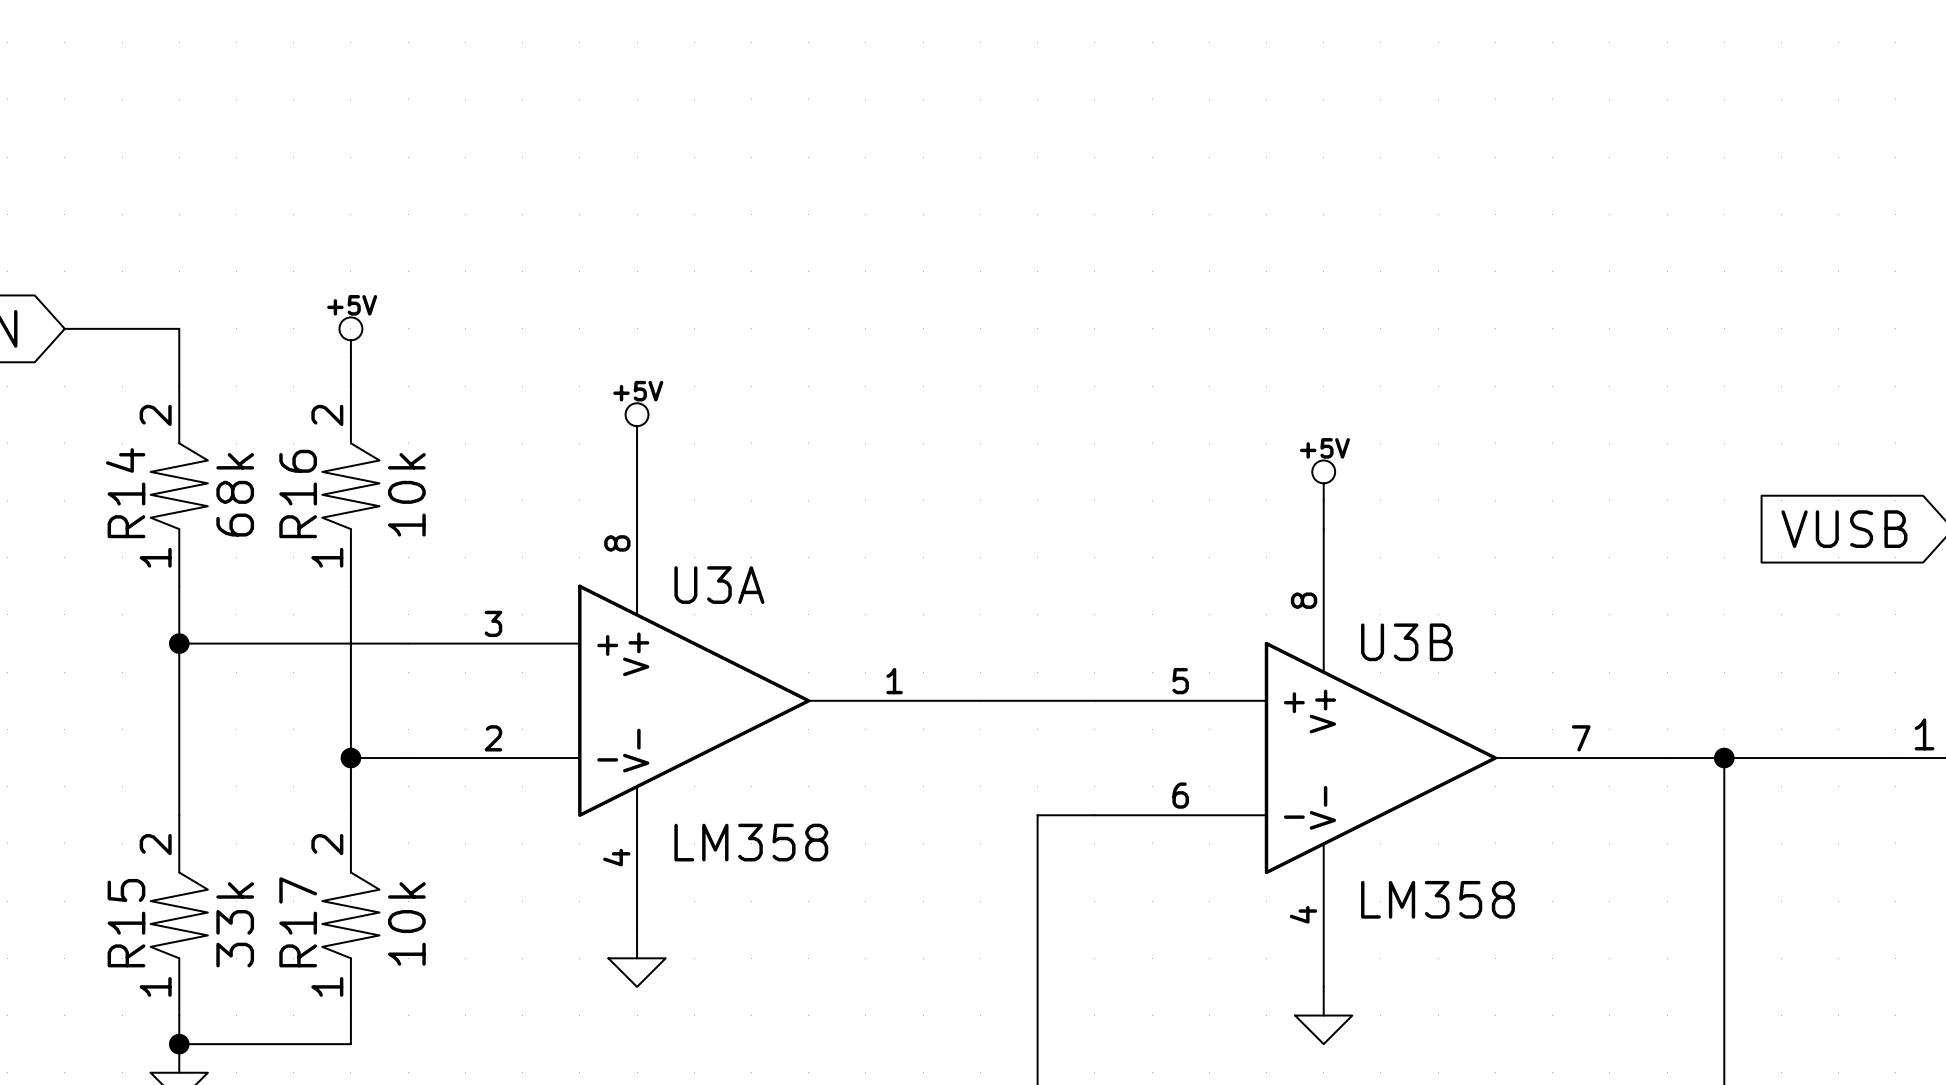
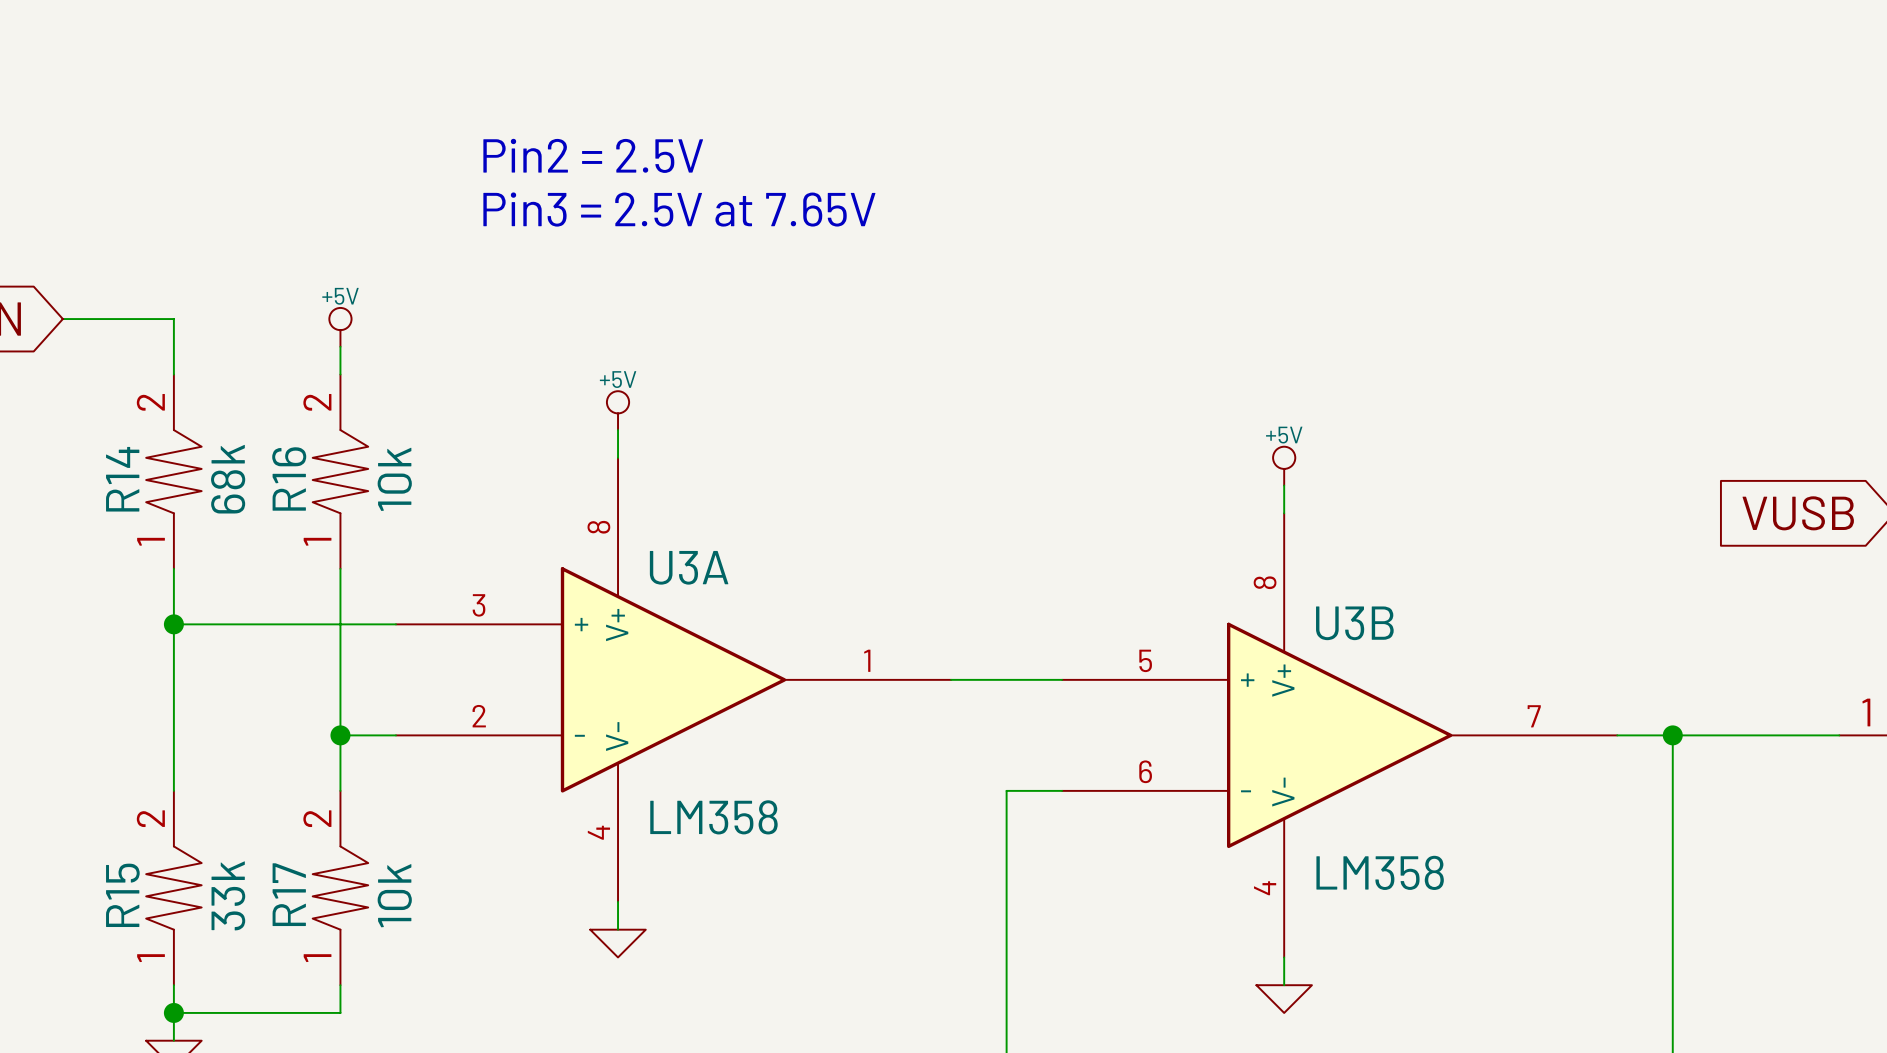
text: none -> Pin2 = 2.5V (593, 155)
text: none -> Pin3 = 2.5V at 7.65V (679, 209)

